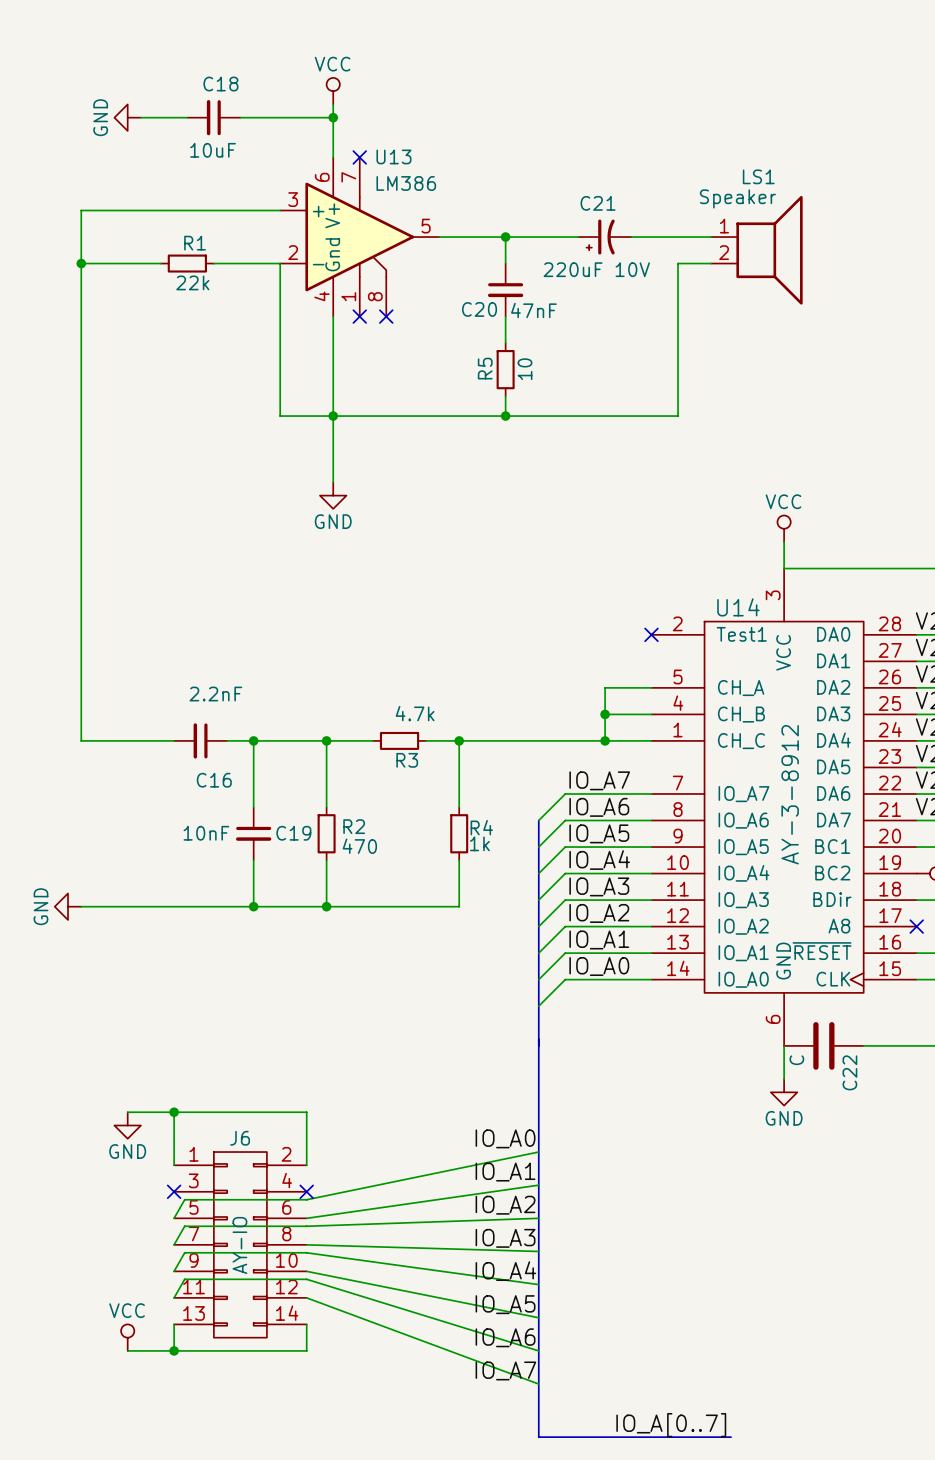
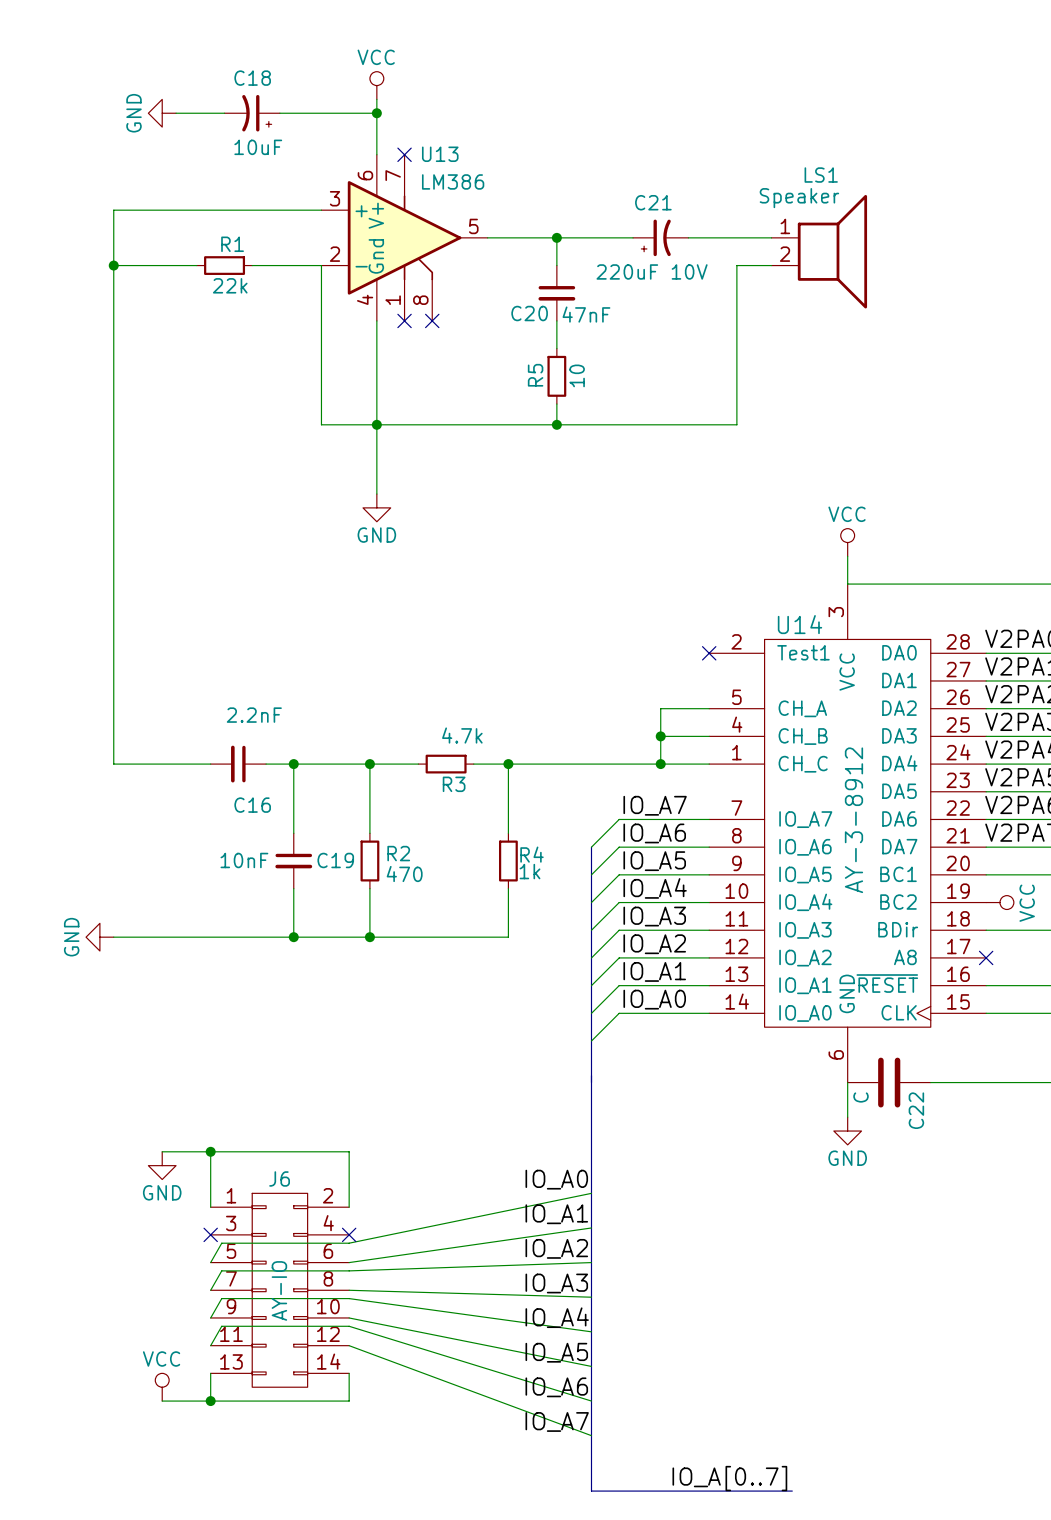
C18 symbol: [187, 100, 241, 136] -> [224, 94, 280, 132]

